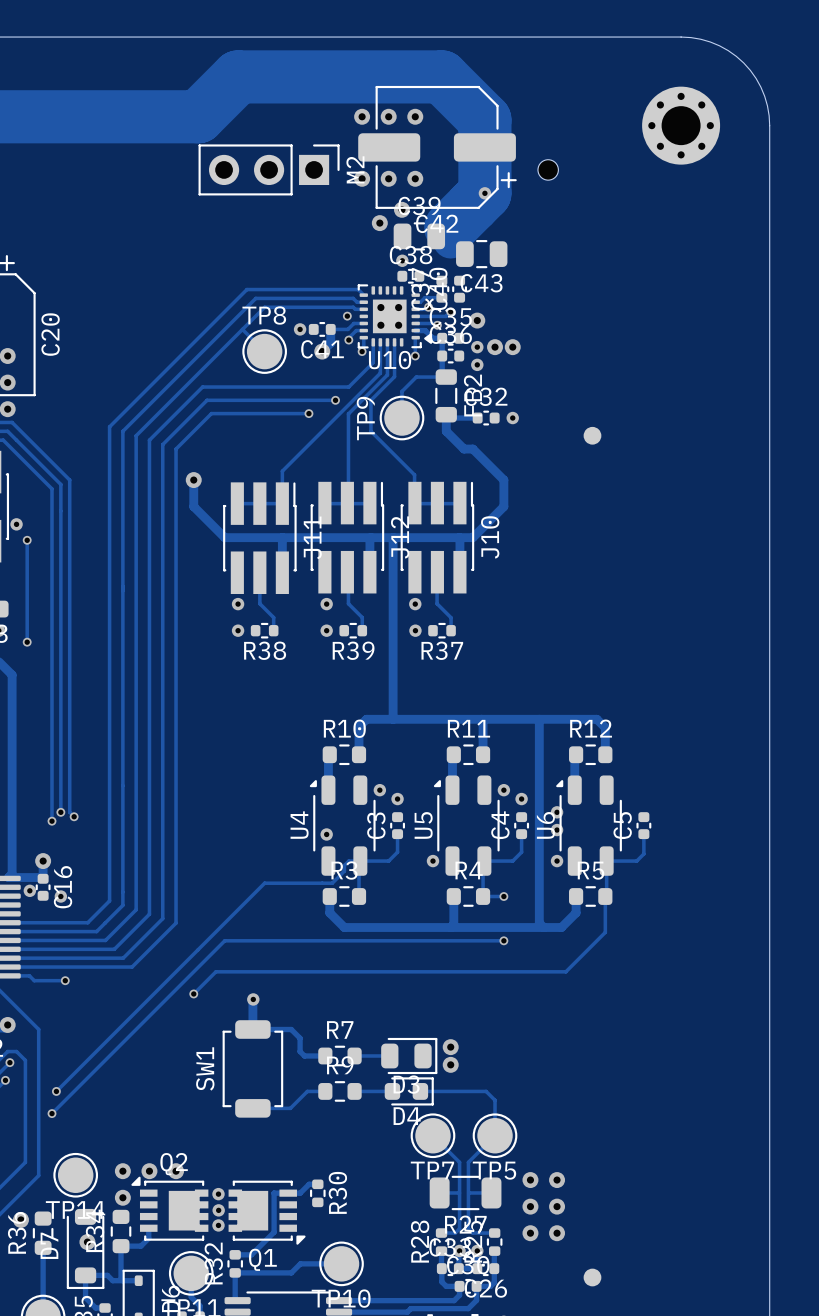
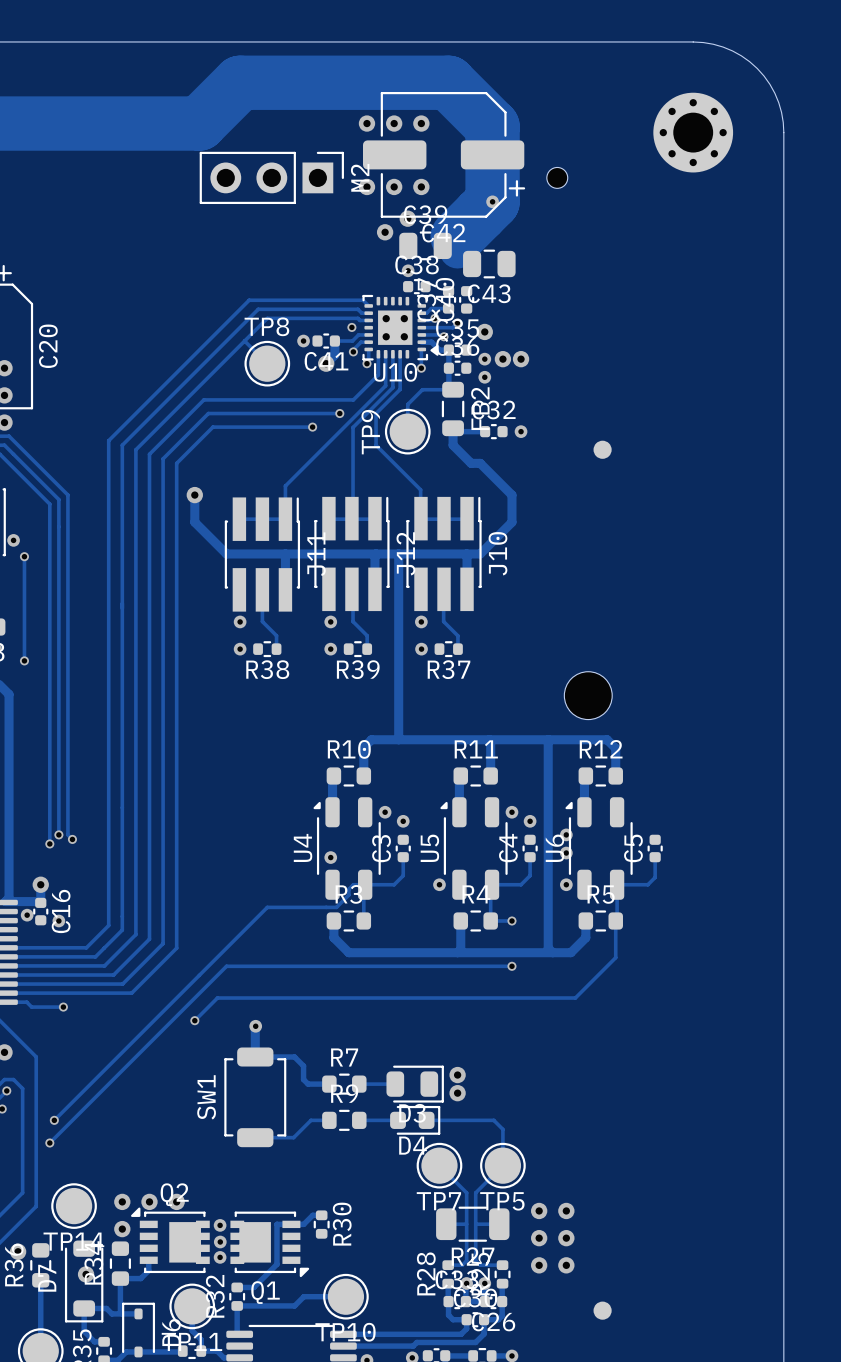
part: none -> (588, 695)

